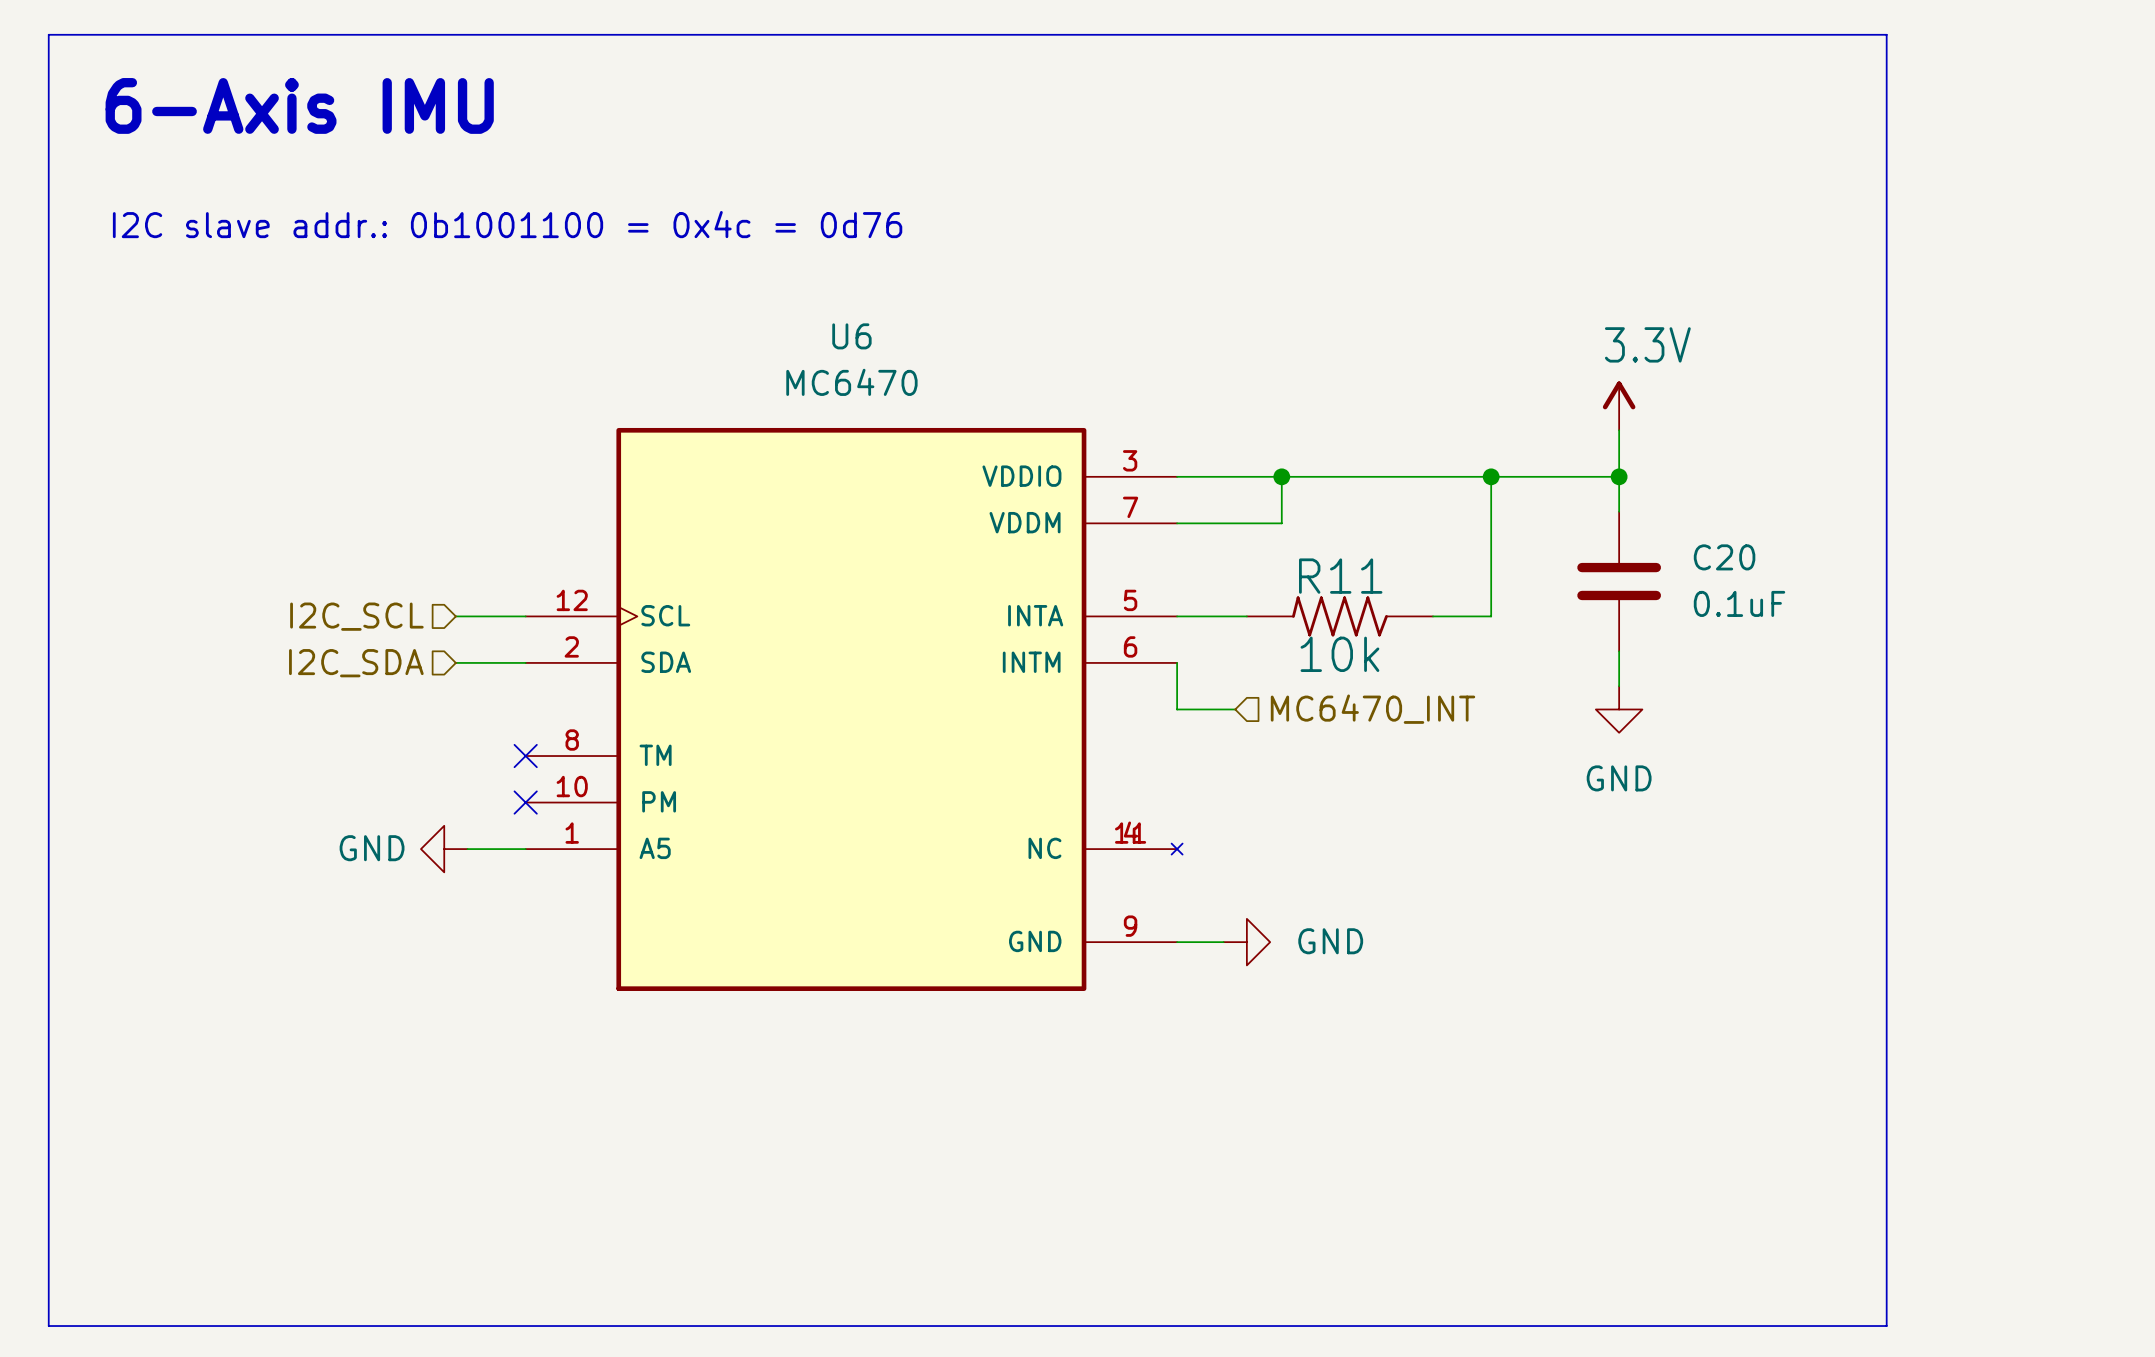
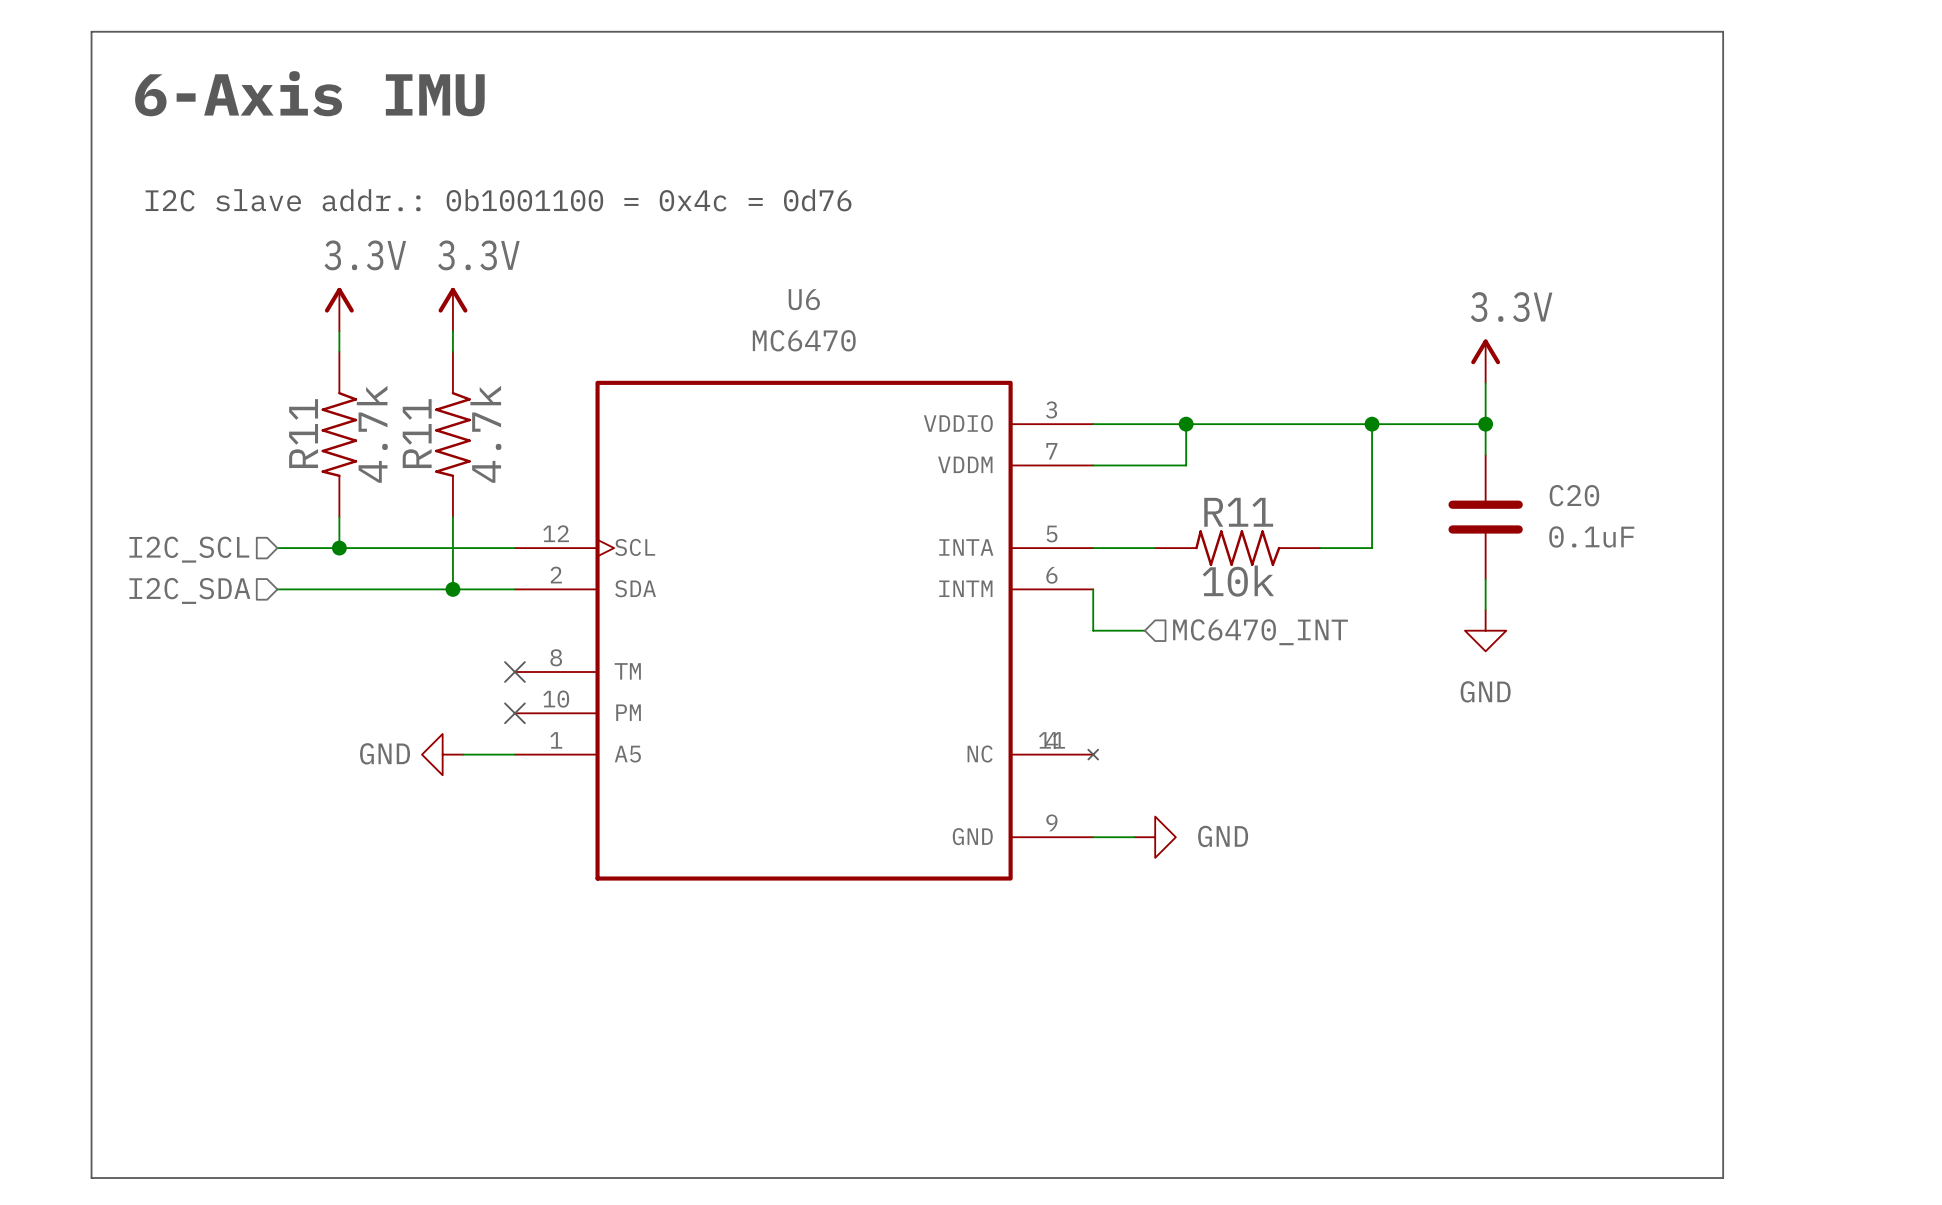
power symbol: none -> 3.3V (339, 309)
power symbol: none -> 3.3V (452, 309)
wire: none -> (339, 331) (339, 351)
wire: none -> (452, 331) (452, 351)
R11: none -> 4.7k (339, 434)
R11: none -> 4.7k (452, 434)
wire: none -> (339, 517) (339, 548)
wire: none -> (452, 517) (452, 589) (277, 589)
wire: none -> (277, 548) (452, 548)
junction: none -> (339, 548)
hierarchical label position: I2C_SCL (356, 616) -> I2C_SCL (189, 549)
junction: none -> (452, 589)
hierarchical label position: I2C_SDA (356, 663) -> I2C_SDA (189, 590)

